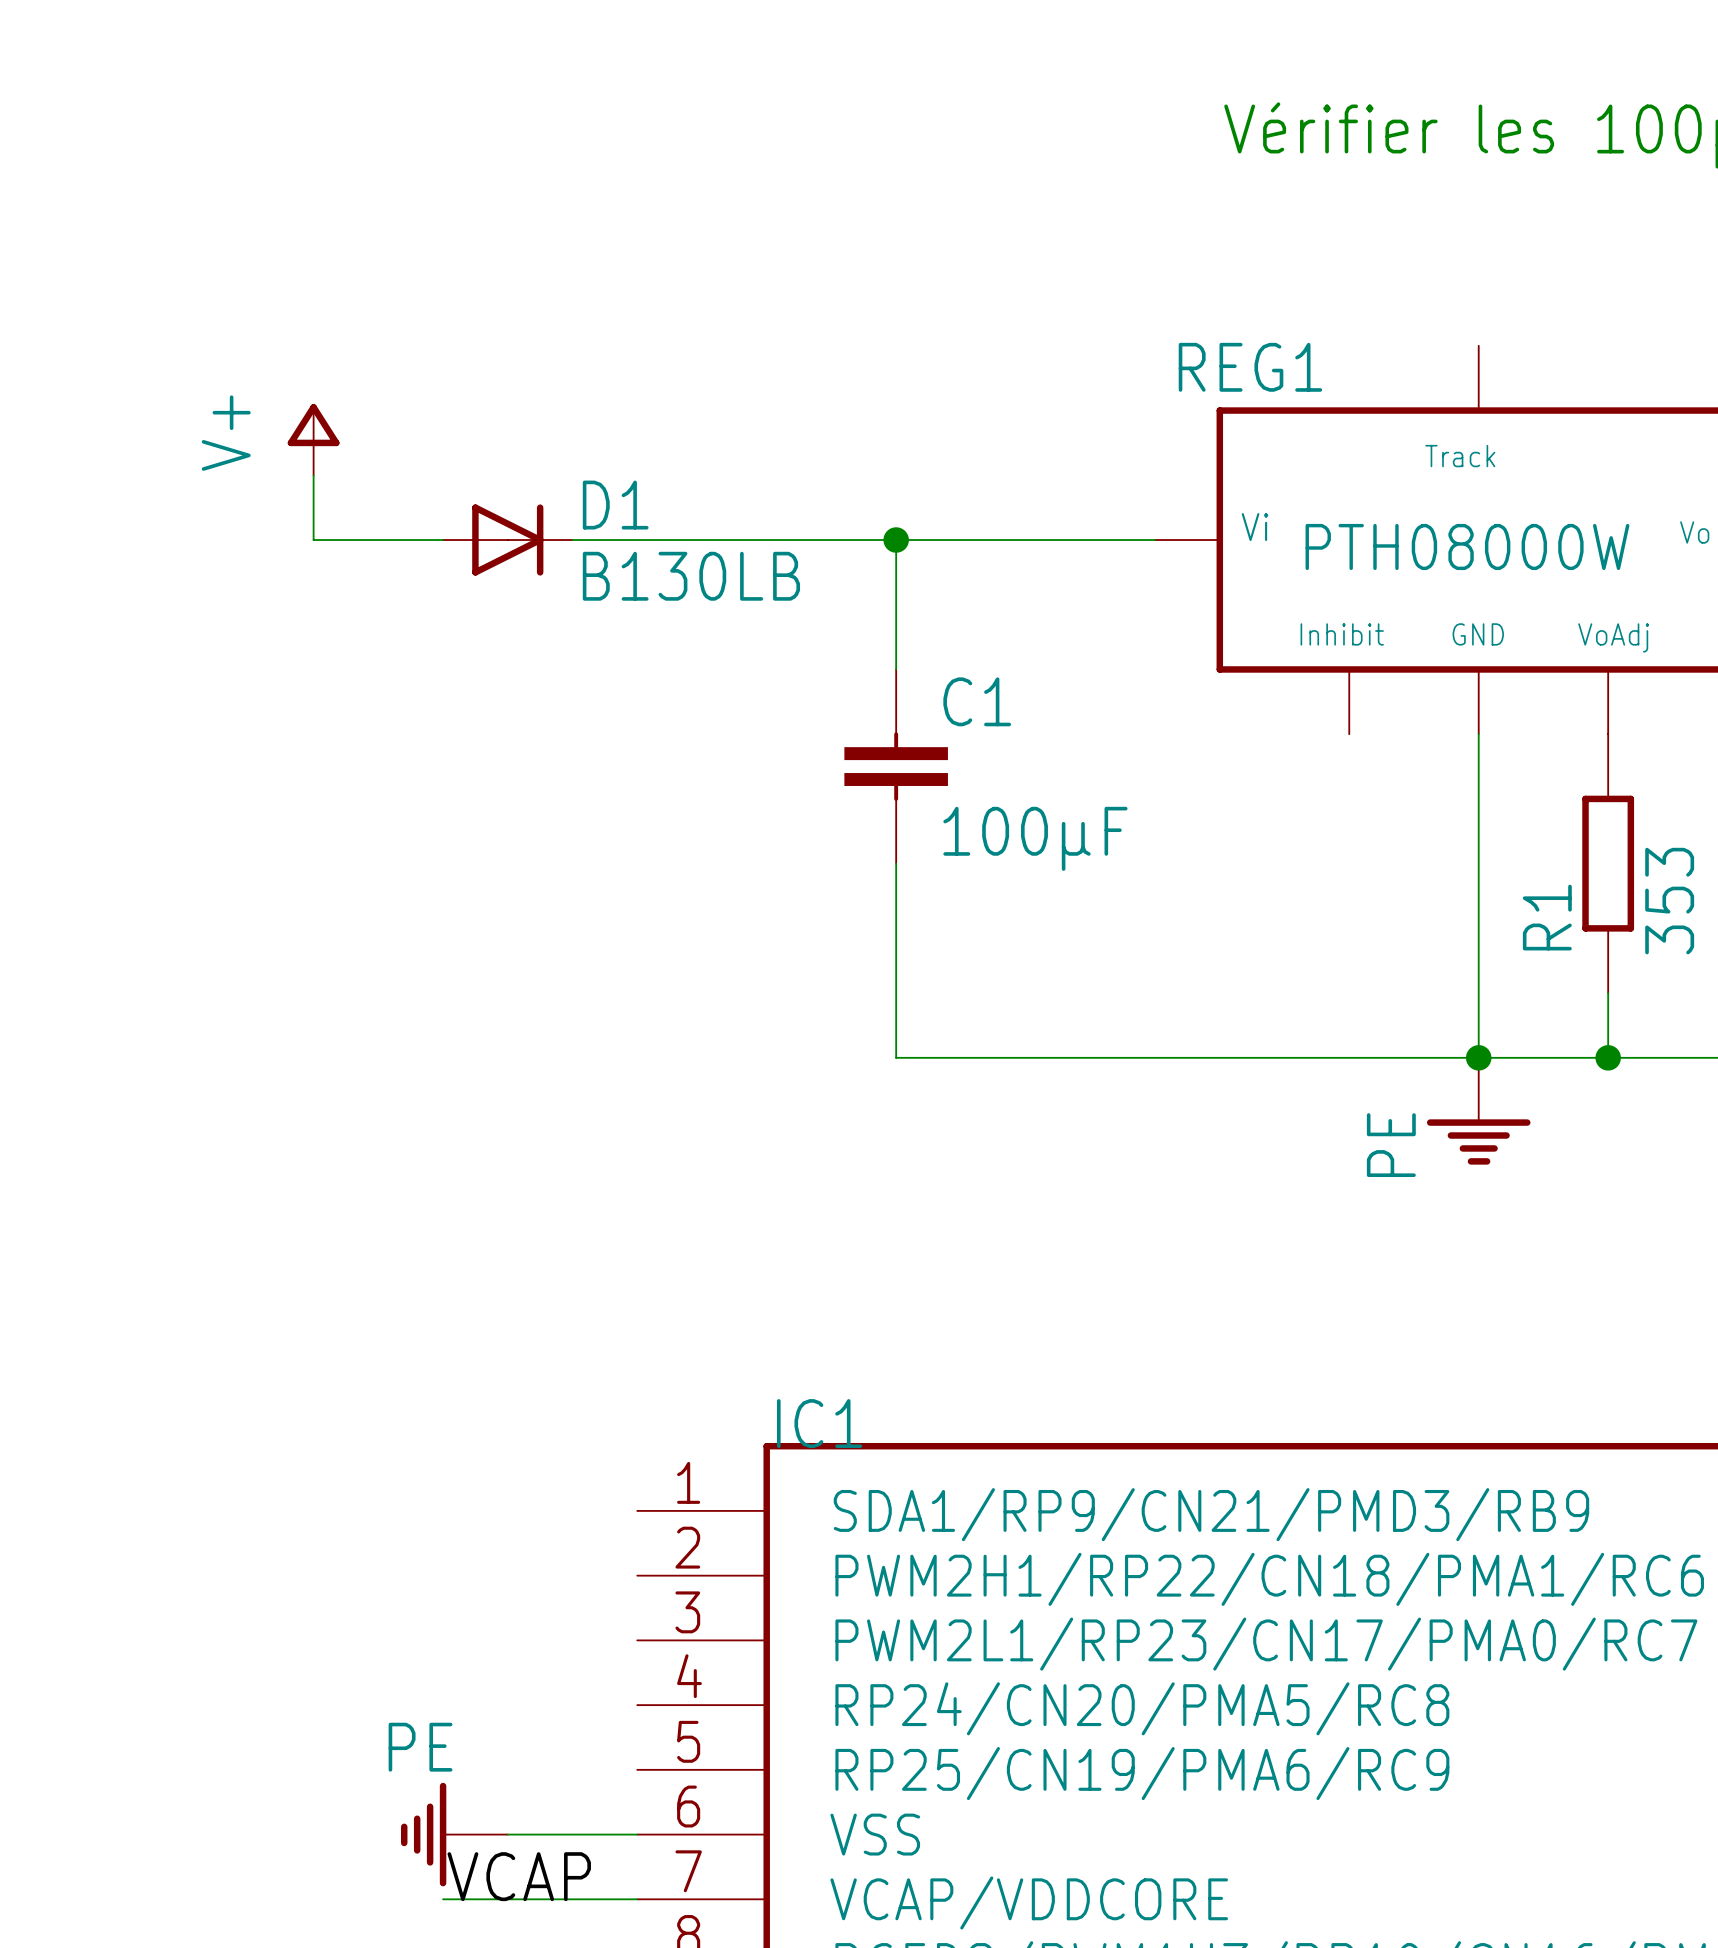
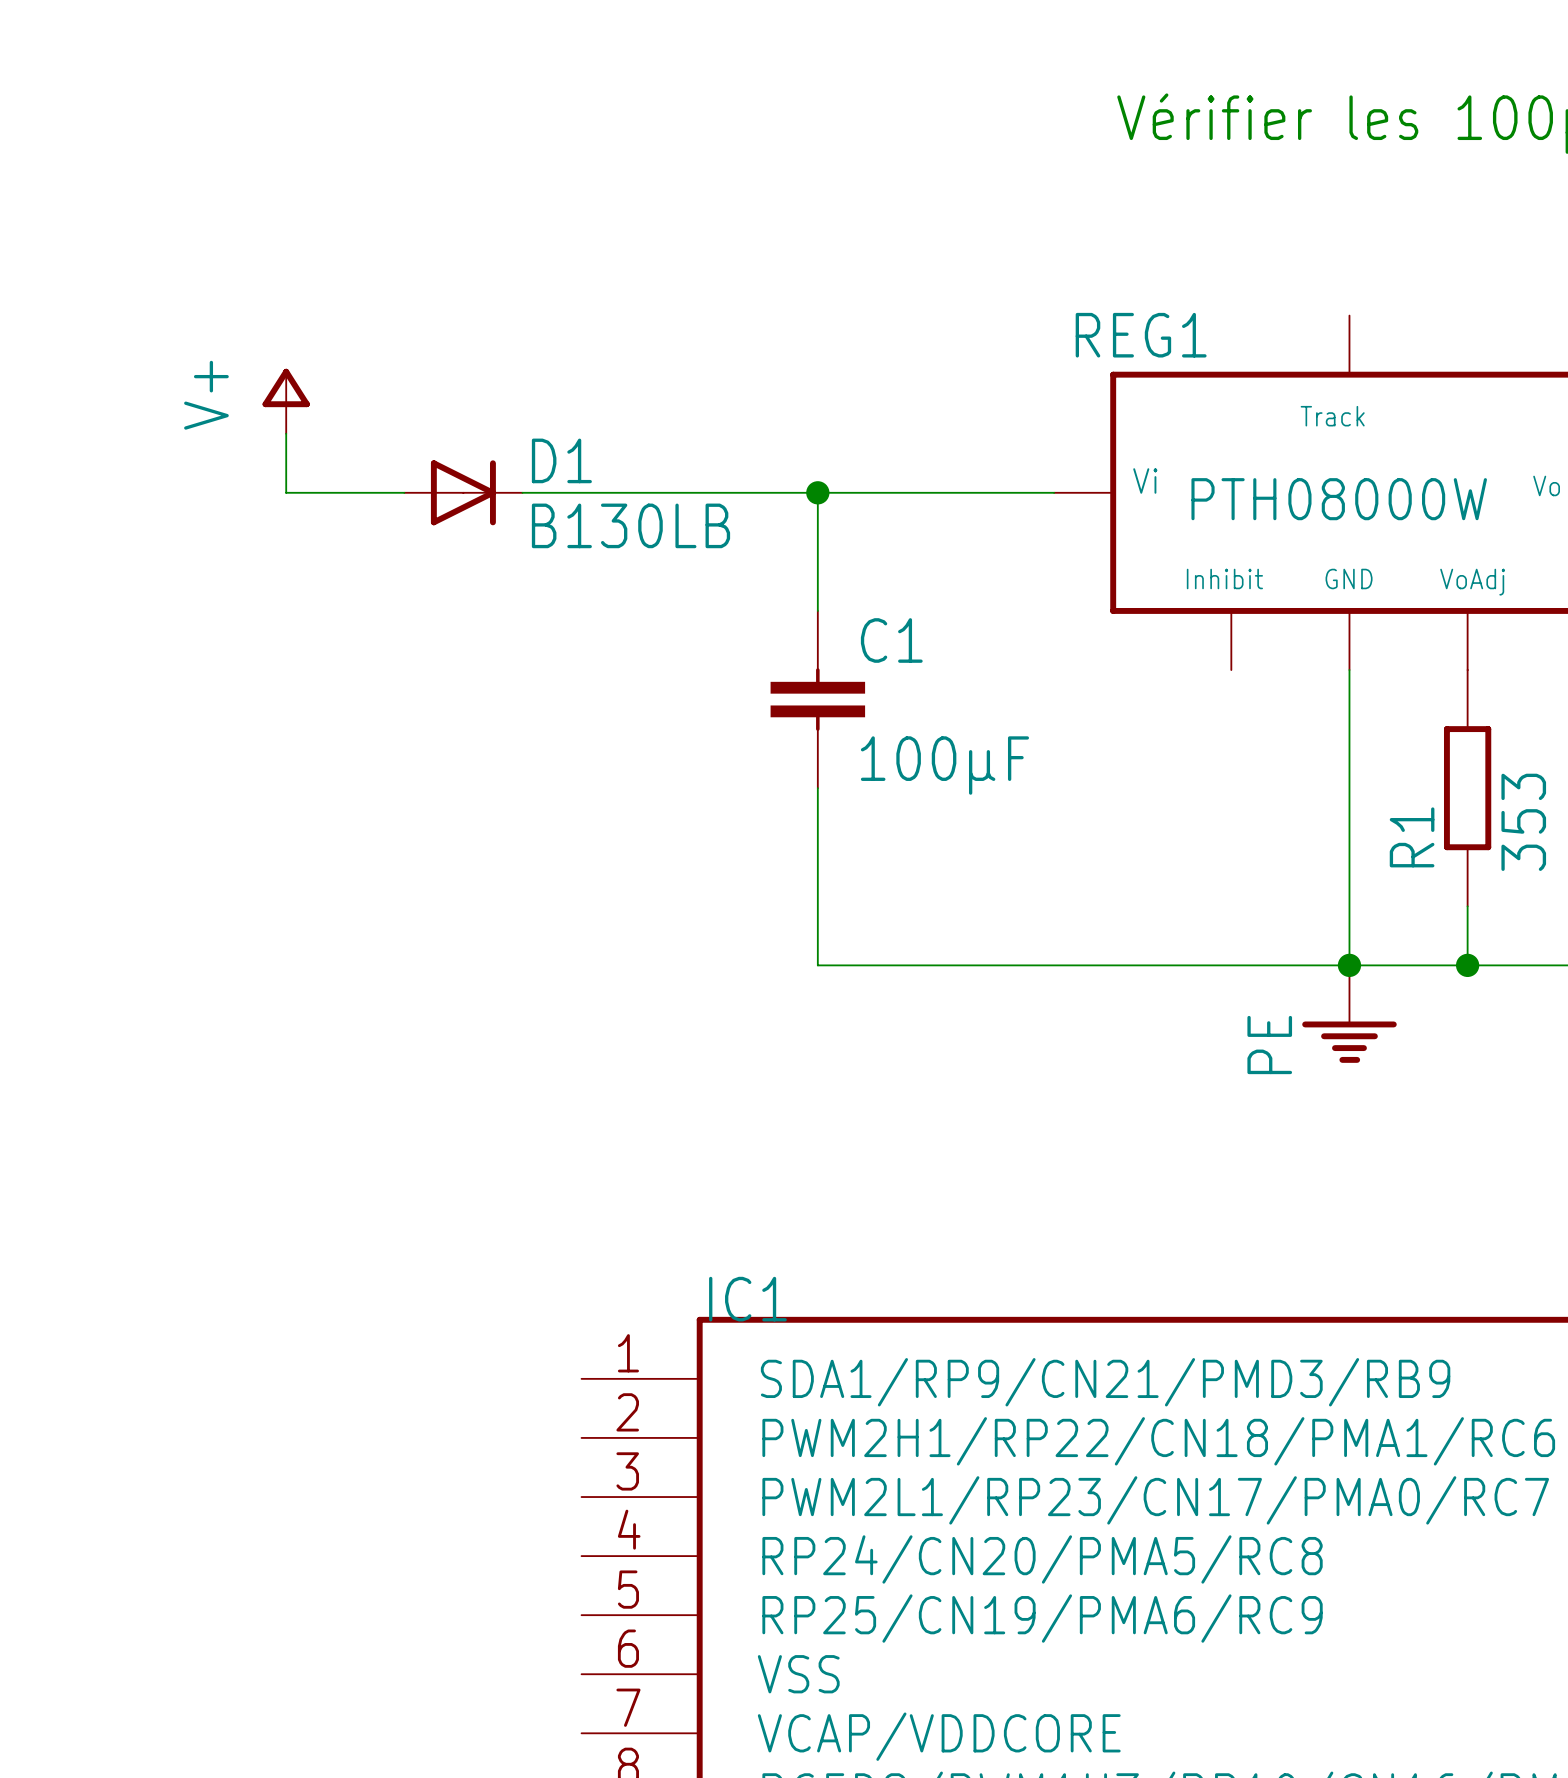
power symbol: PE (454, 1834) -> none
wire: (507, 1834) (637, 1834) -> none
label: VCAP (519, 1876) -> none
wire: (443, 1899) (637, 1899) -> none

